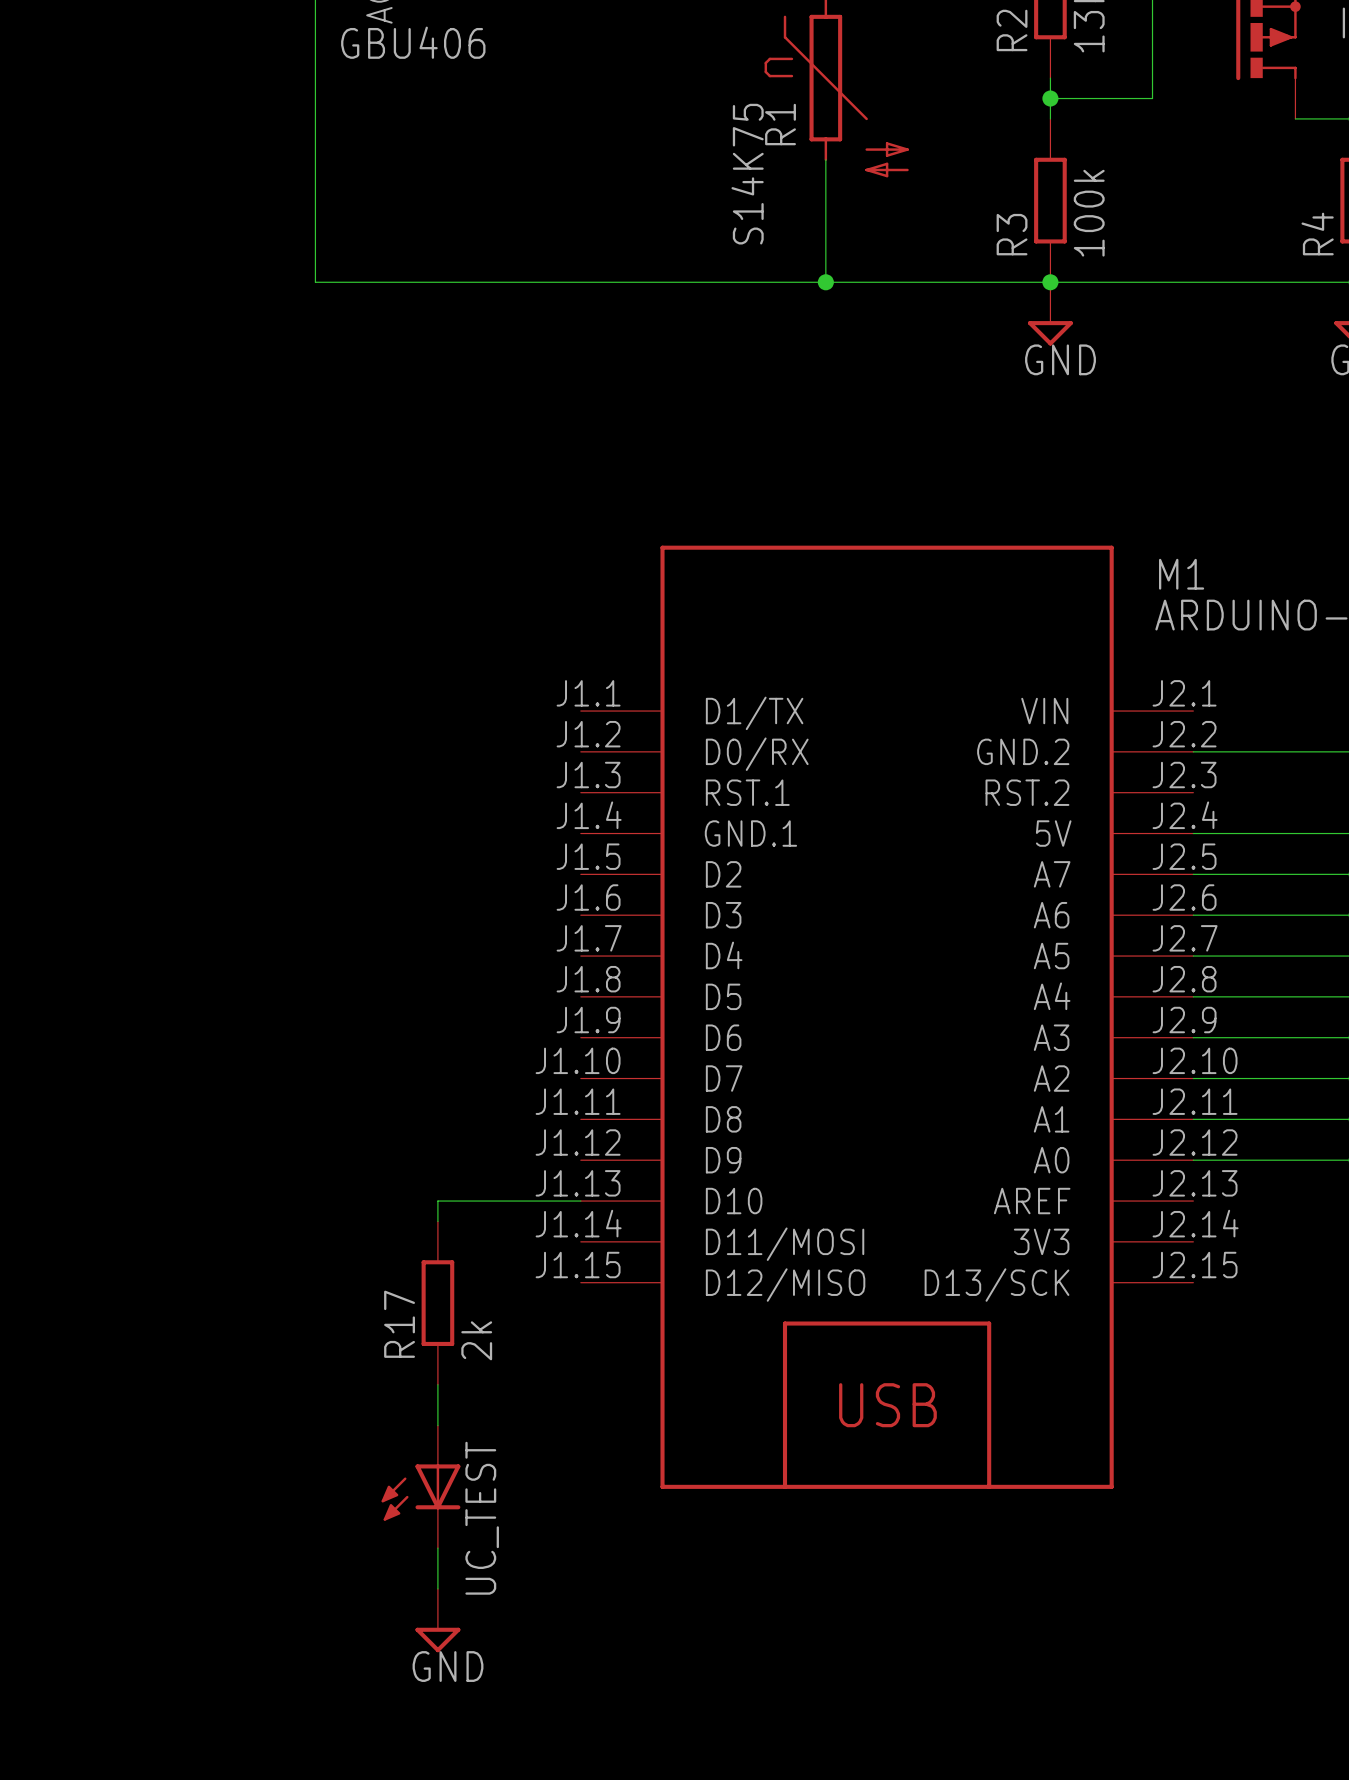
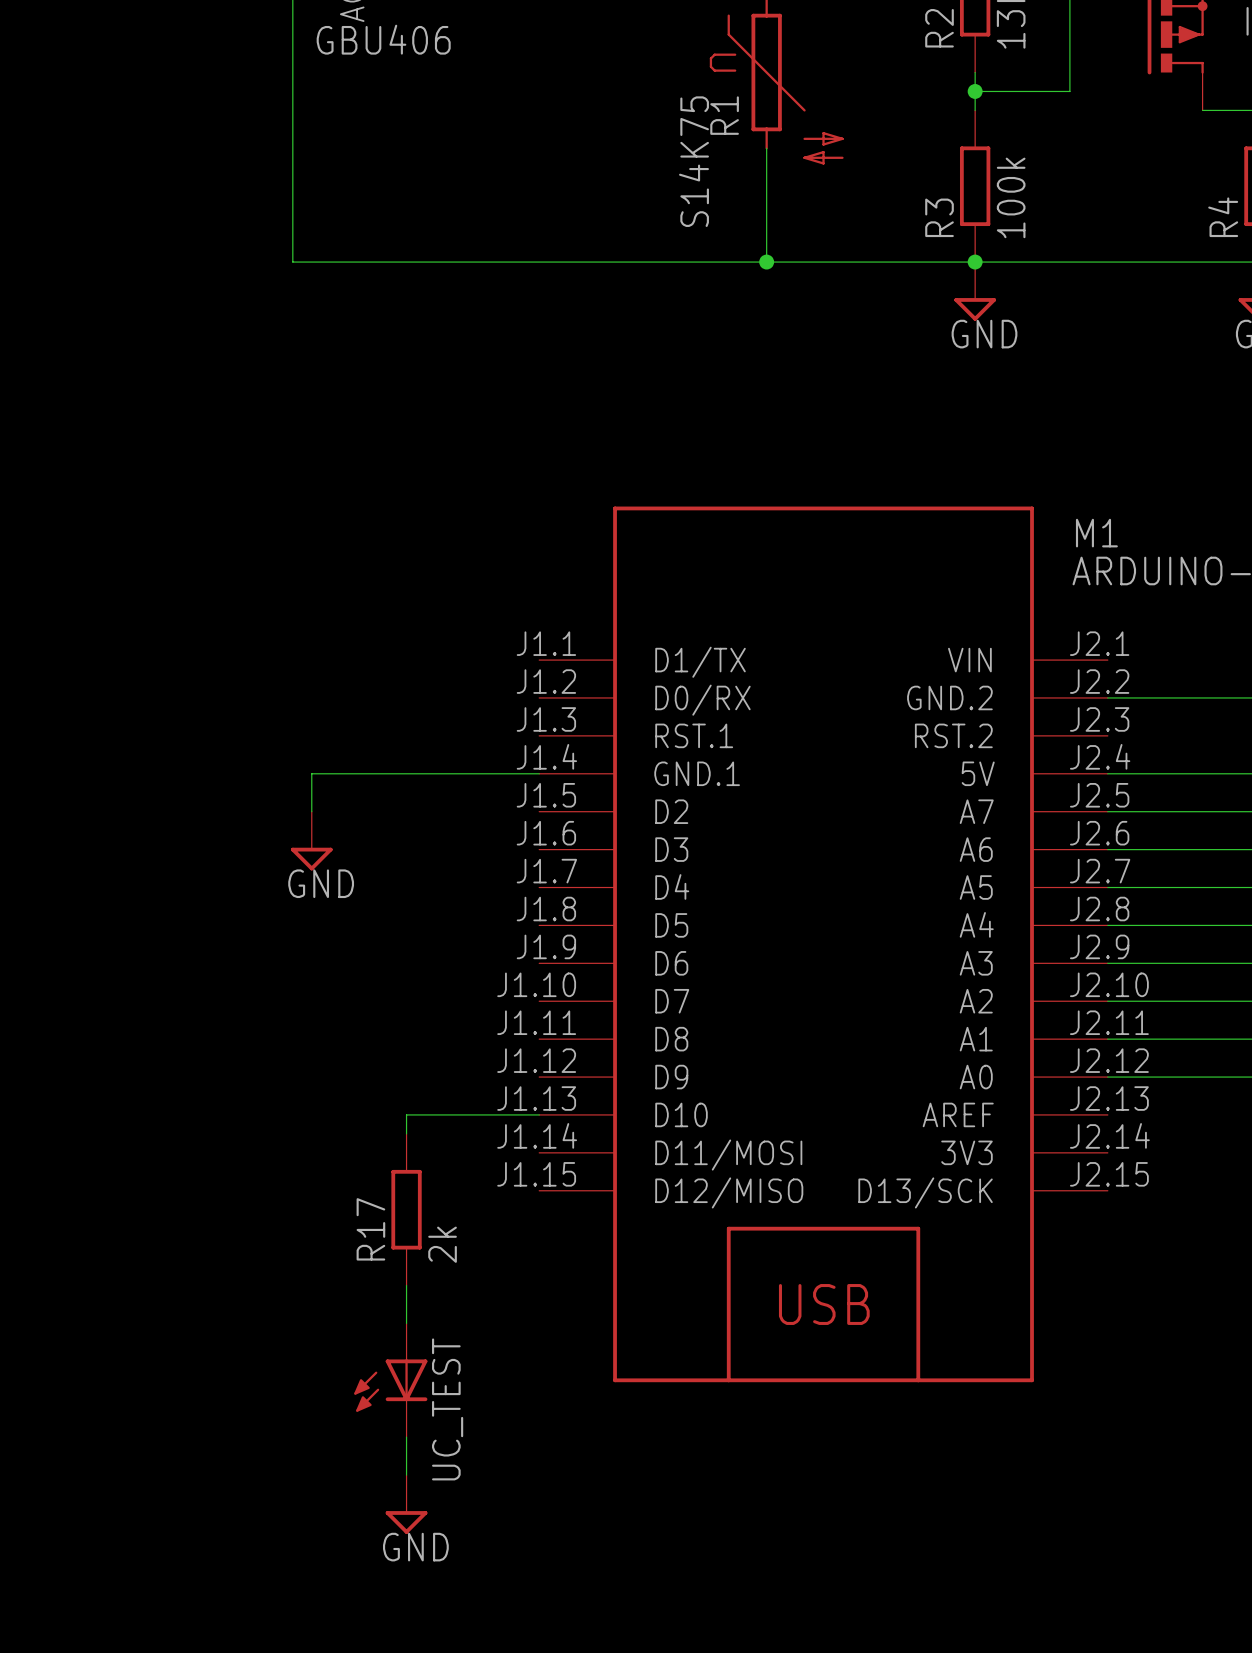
wire: none -> (539, 773) (311, 773) (311, 811)
power symbol: none -> GND (311, 841)

